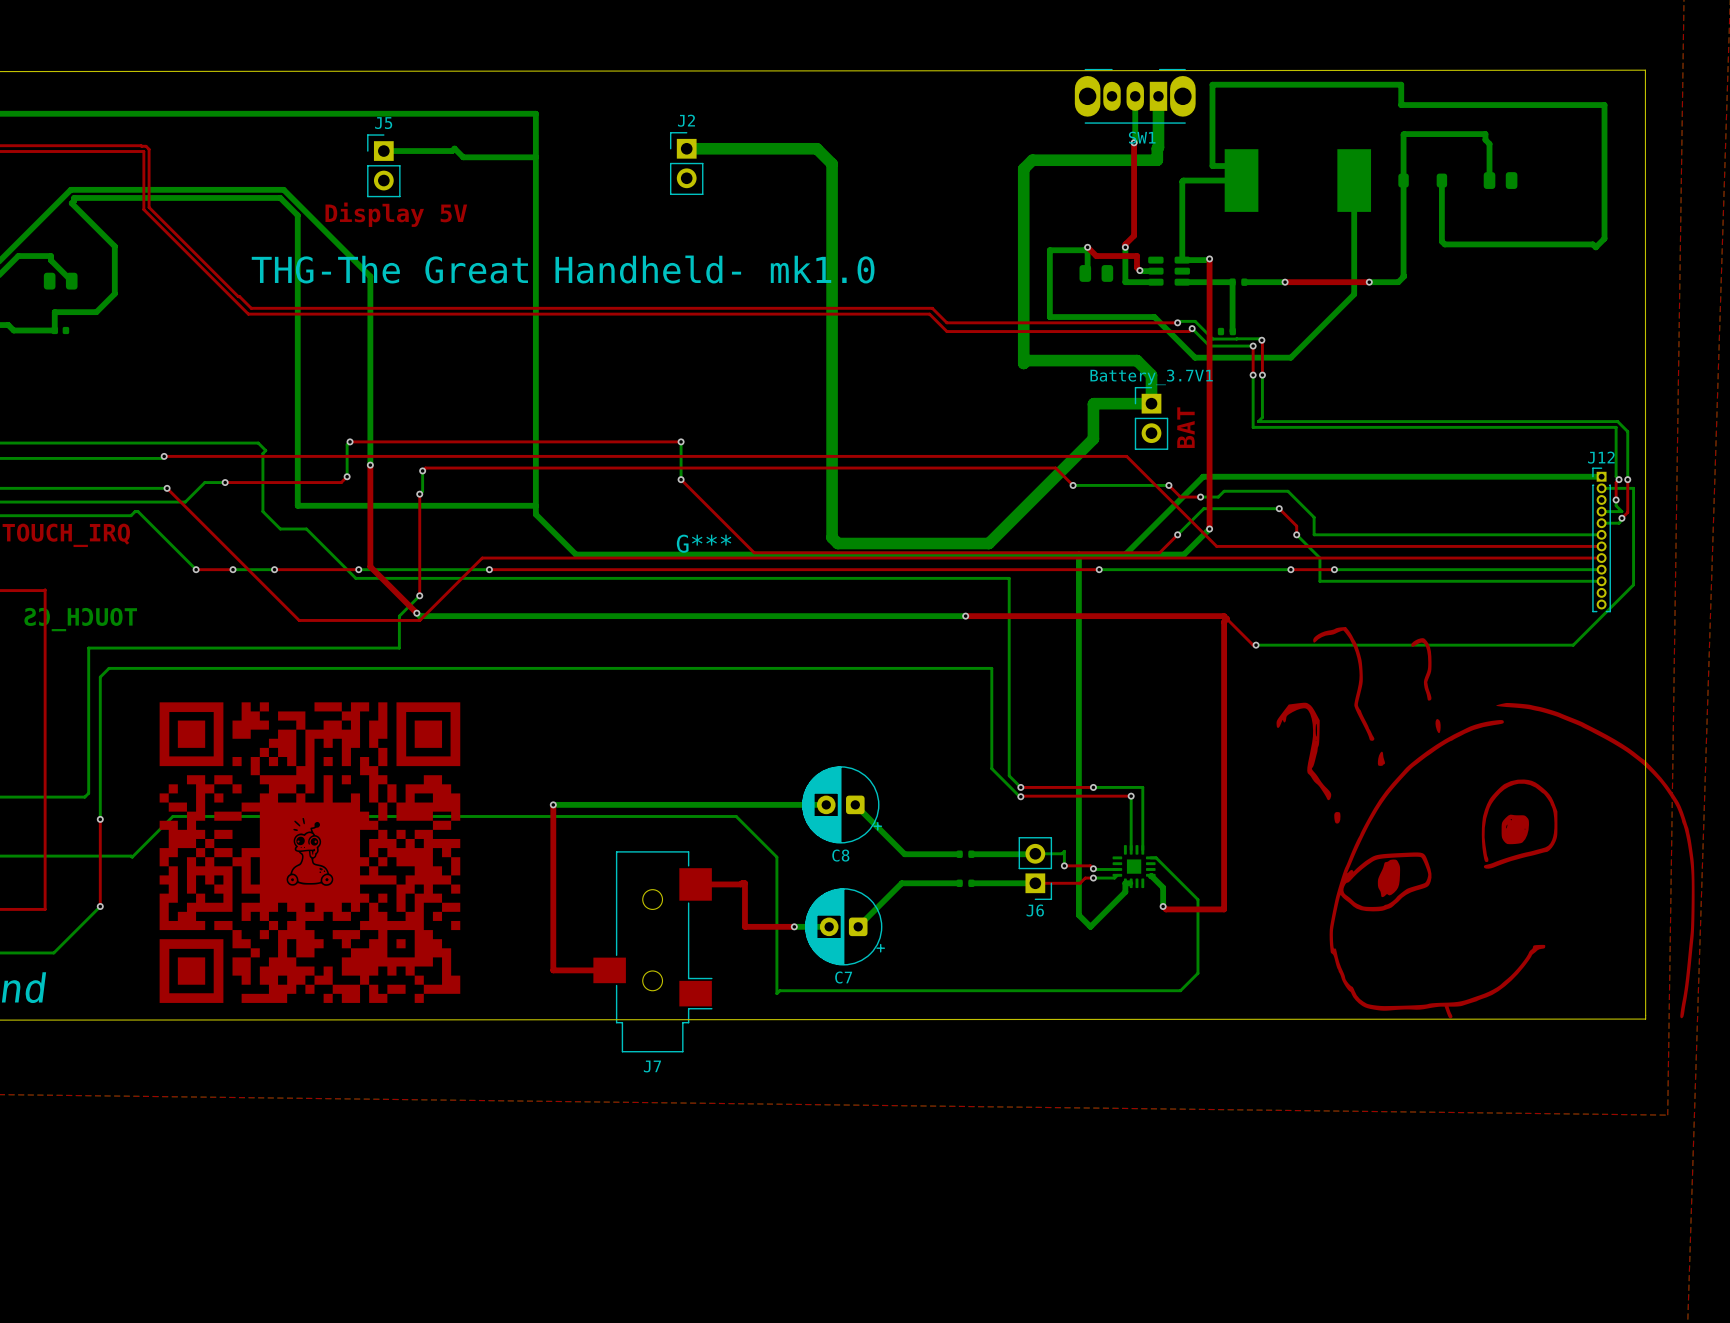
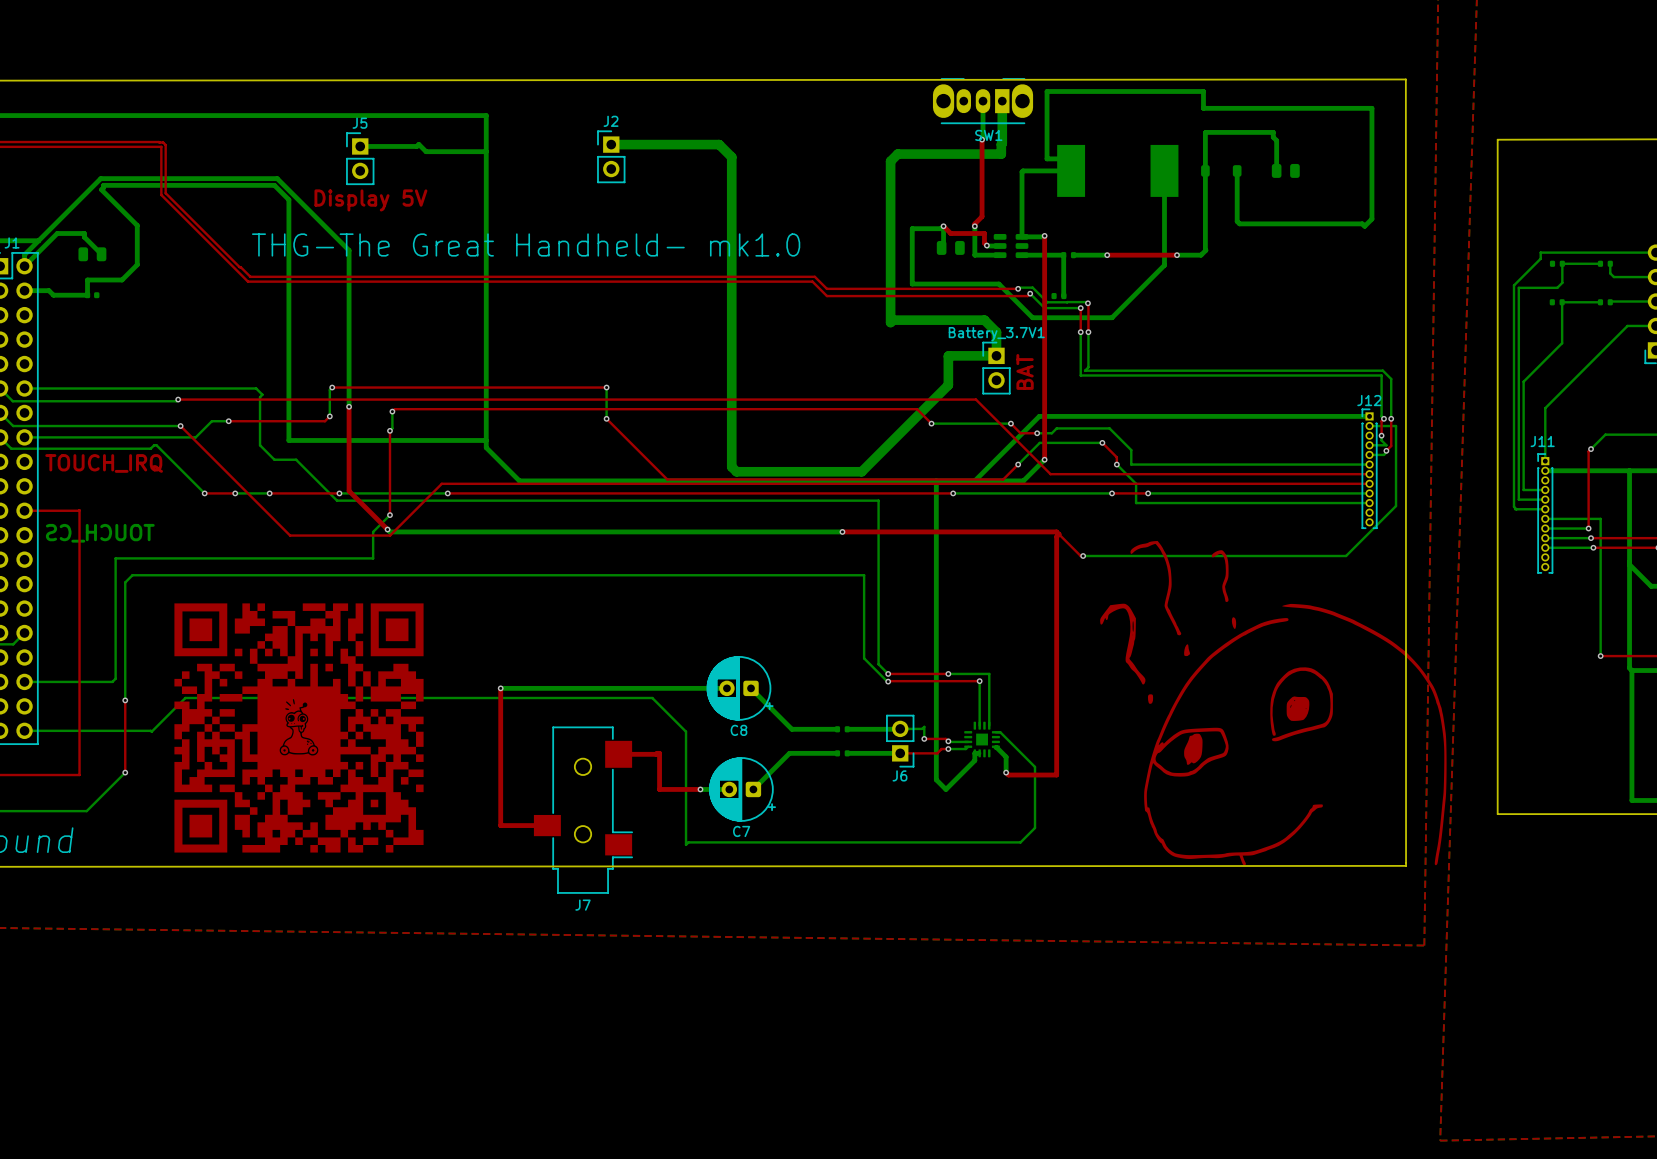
G***: (704, 543) -> none

